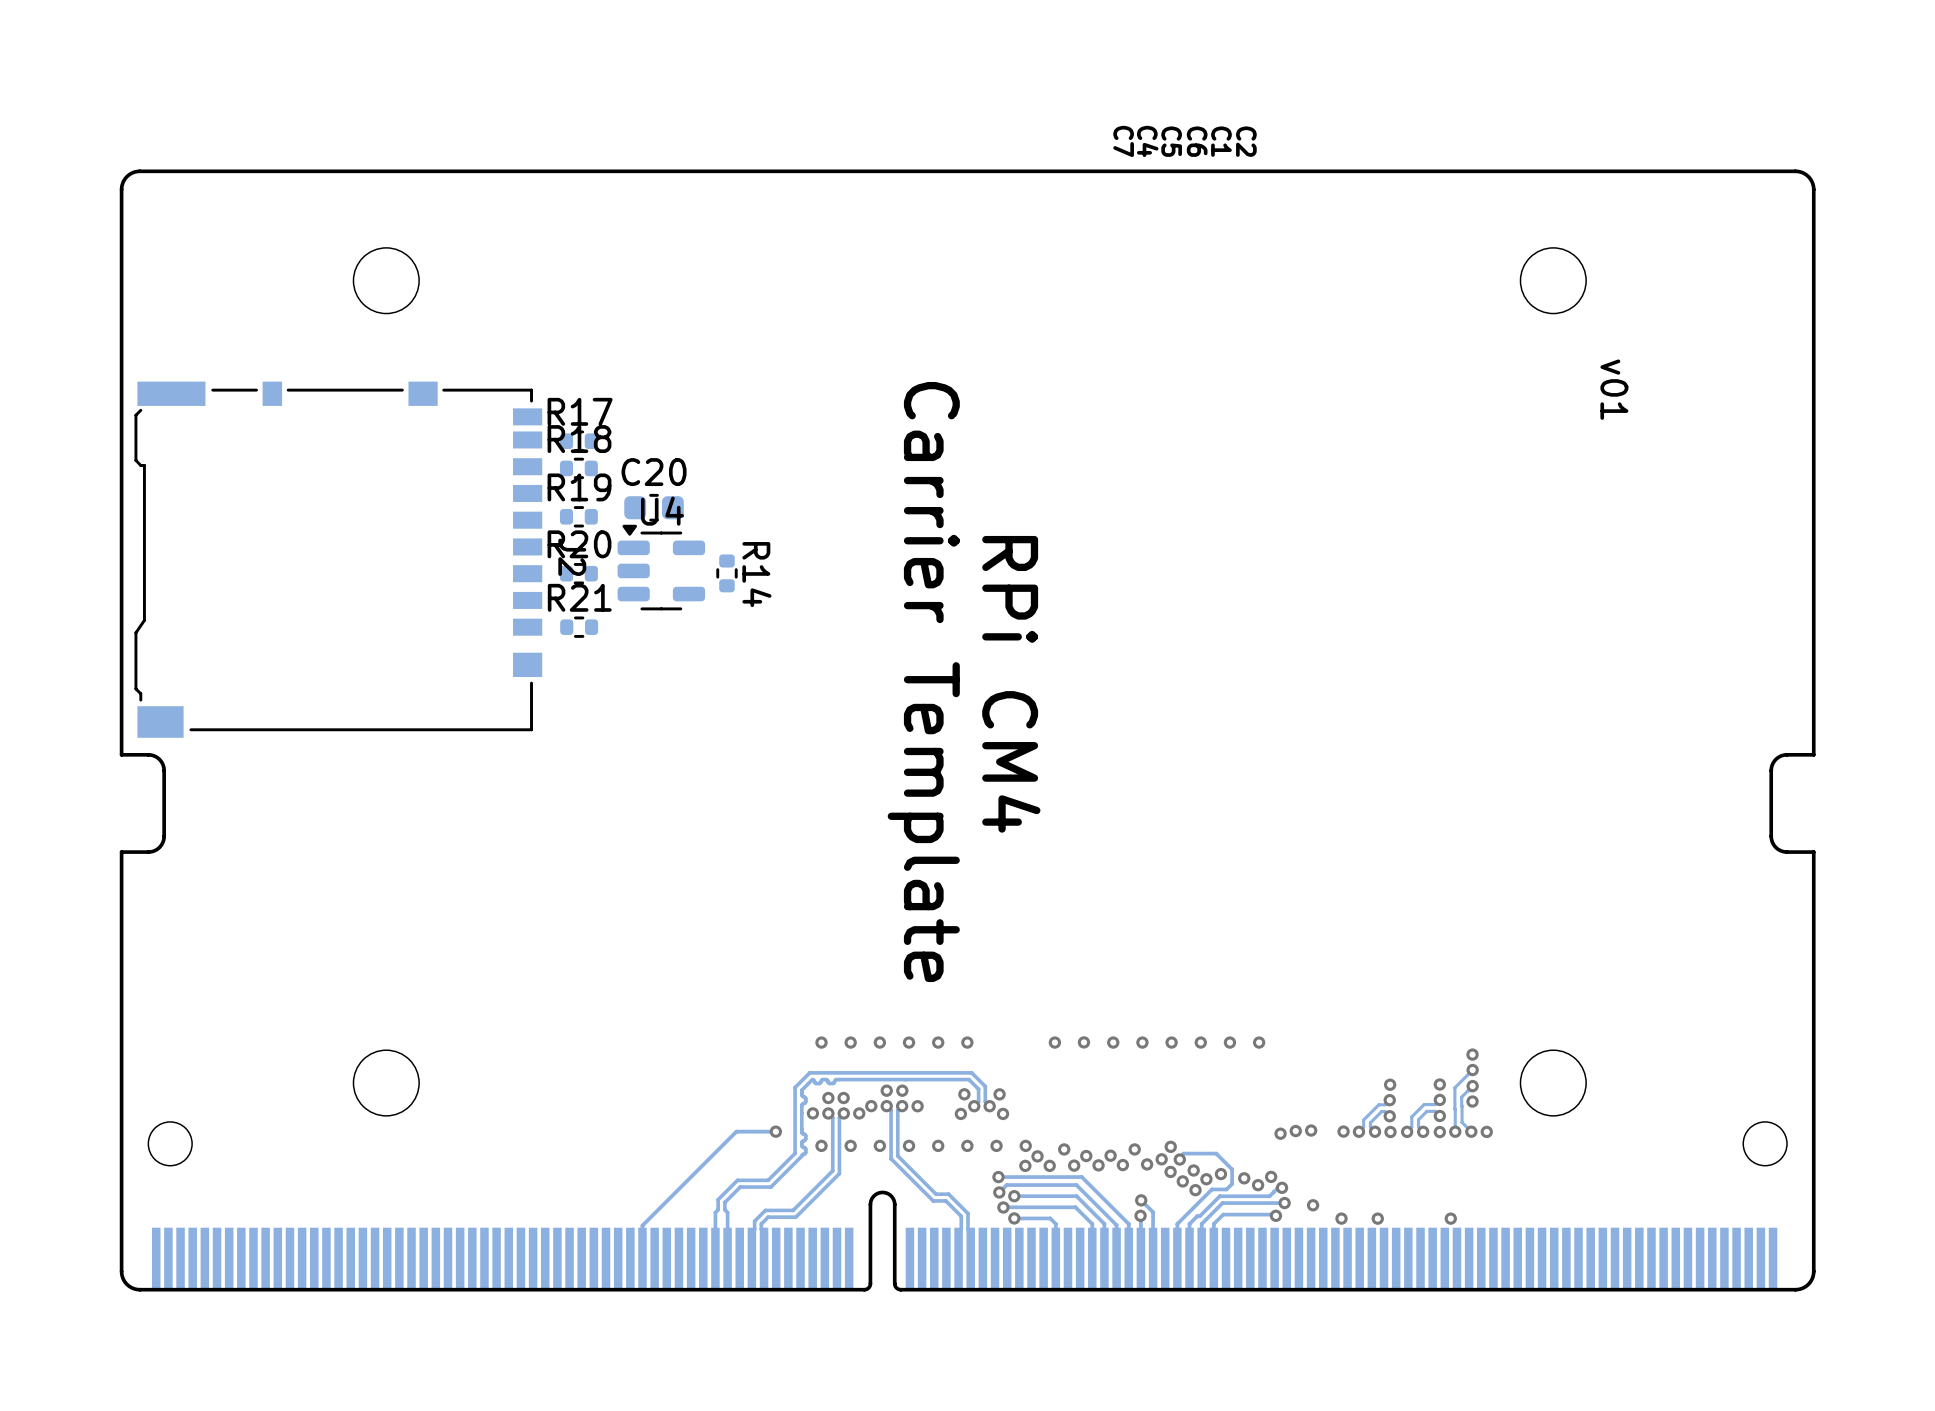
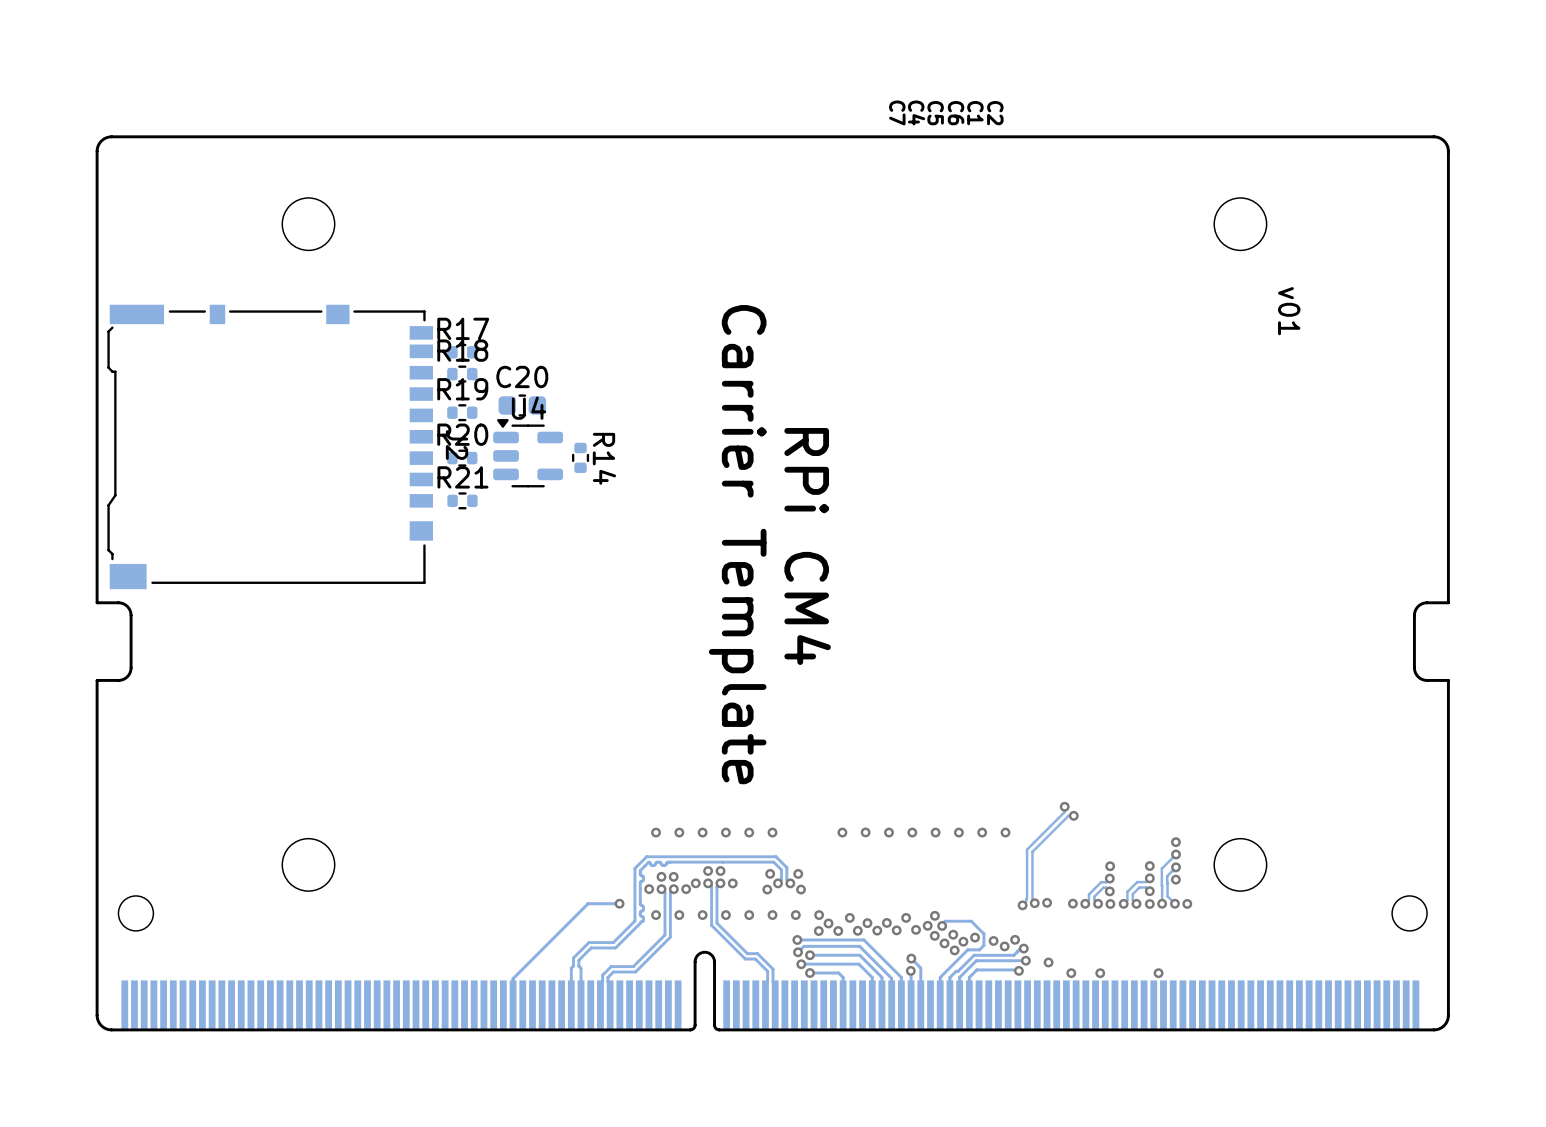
track: none -> (1064, 806) (1064, 811) (1027, 849) (1027, 898) (1022, 905)
via: none -> (1064, 806)
track: none -> (1073, 815) (1068, 815) (1032, 851) (1032, 900) (1034, 903)
via: none -> (1073, 815)

